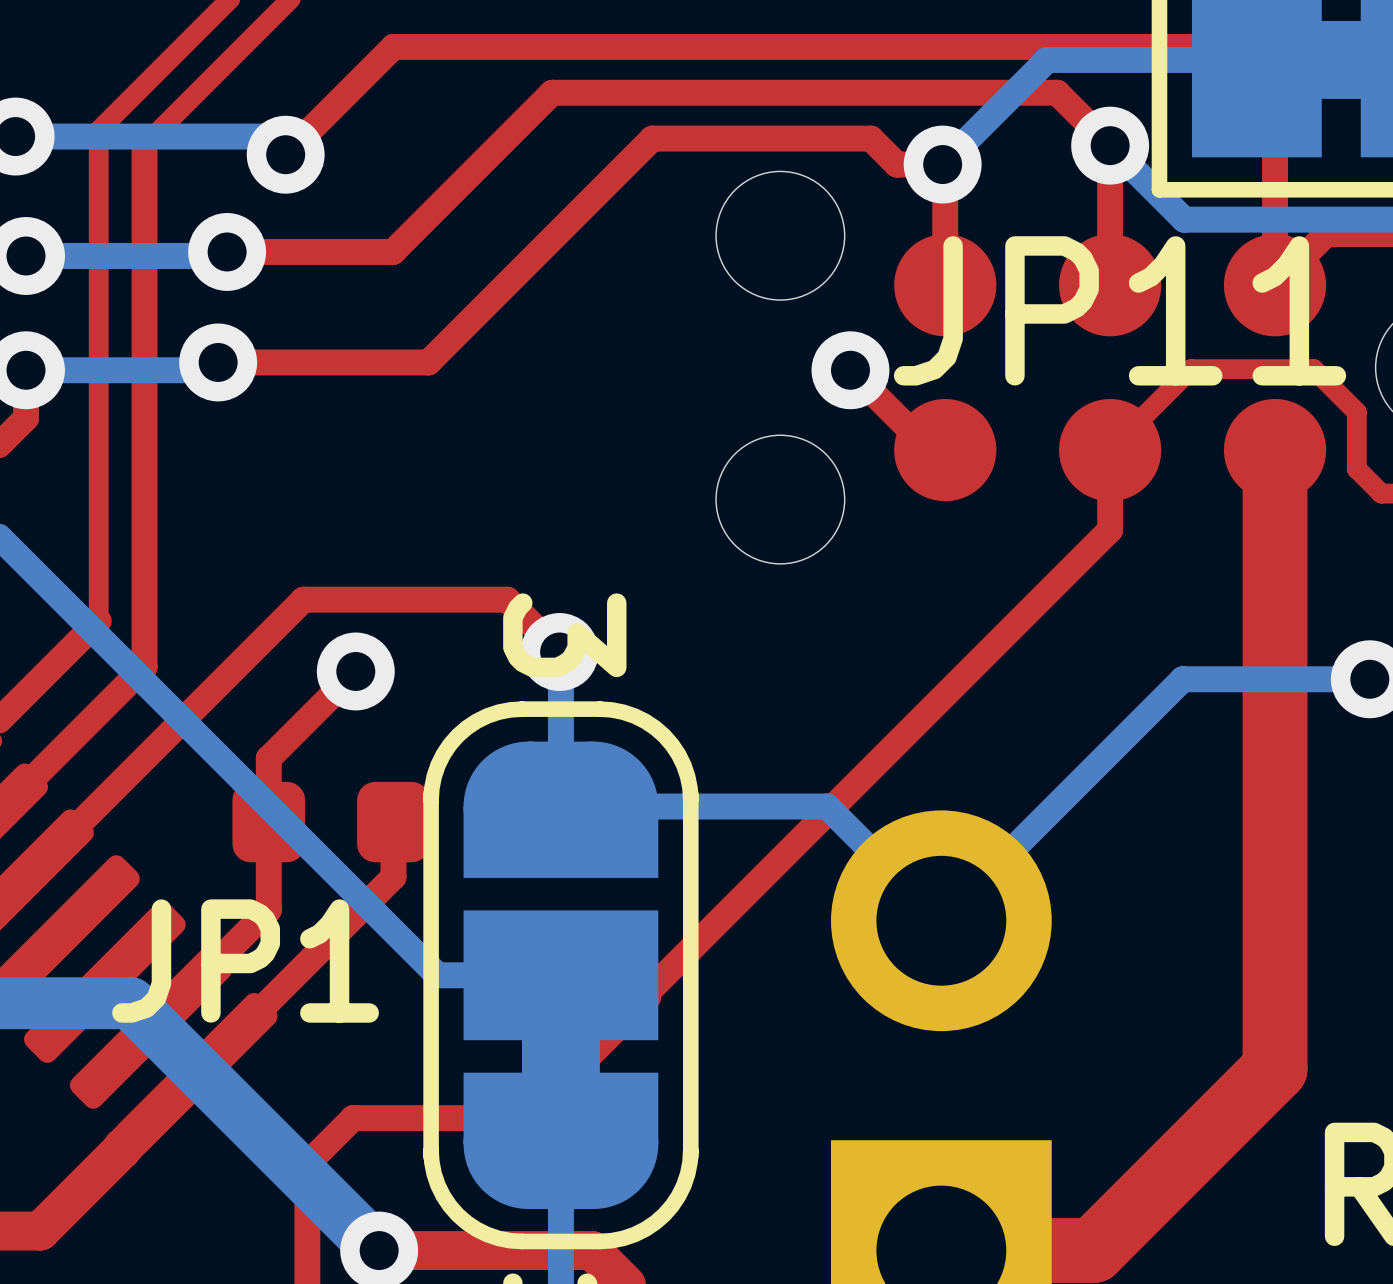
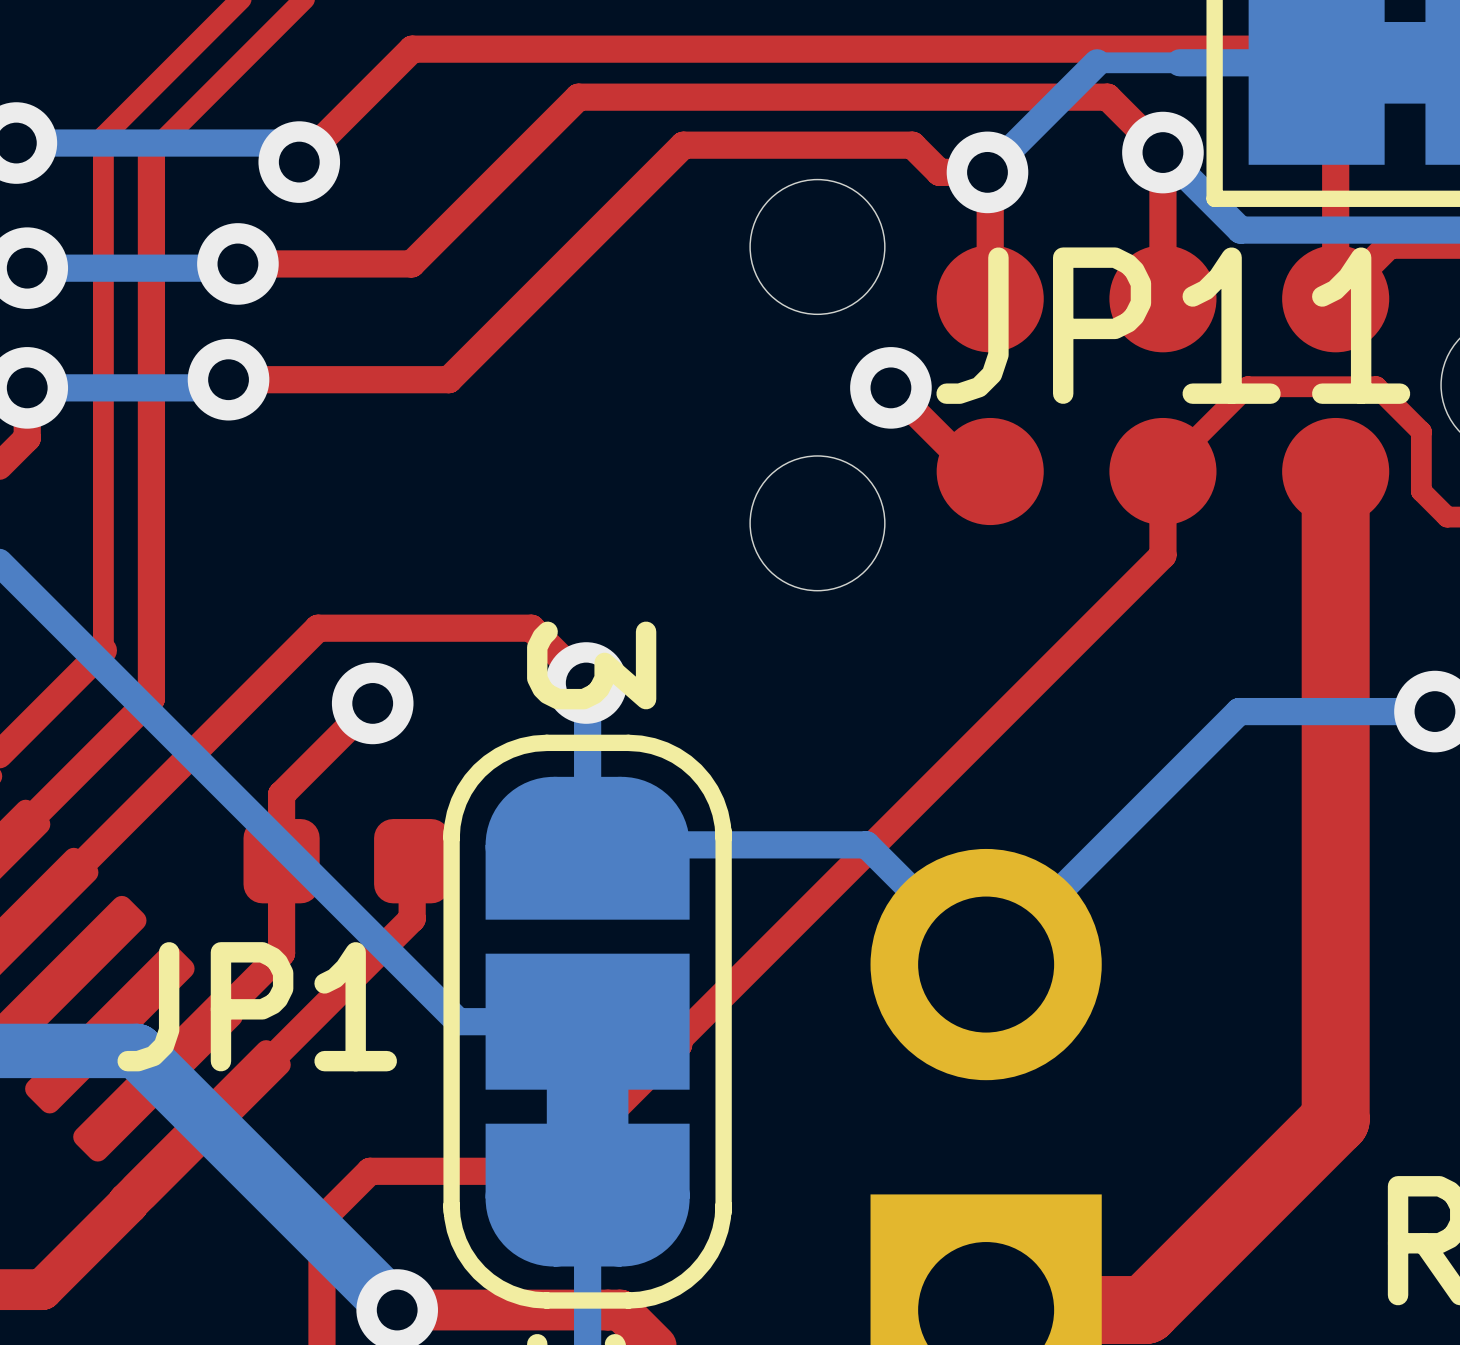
bottom track width: thick (1126, 59) (1047, 59) -> thin (1179, 62) (1097, 62)

